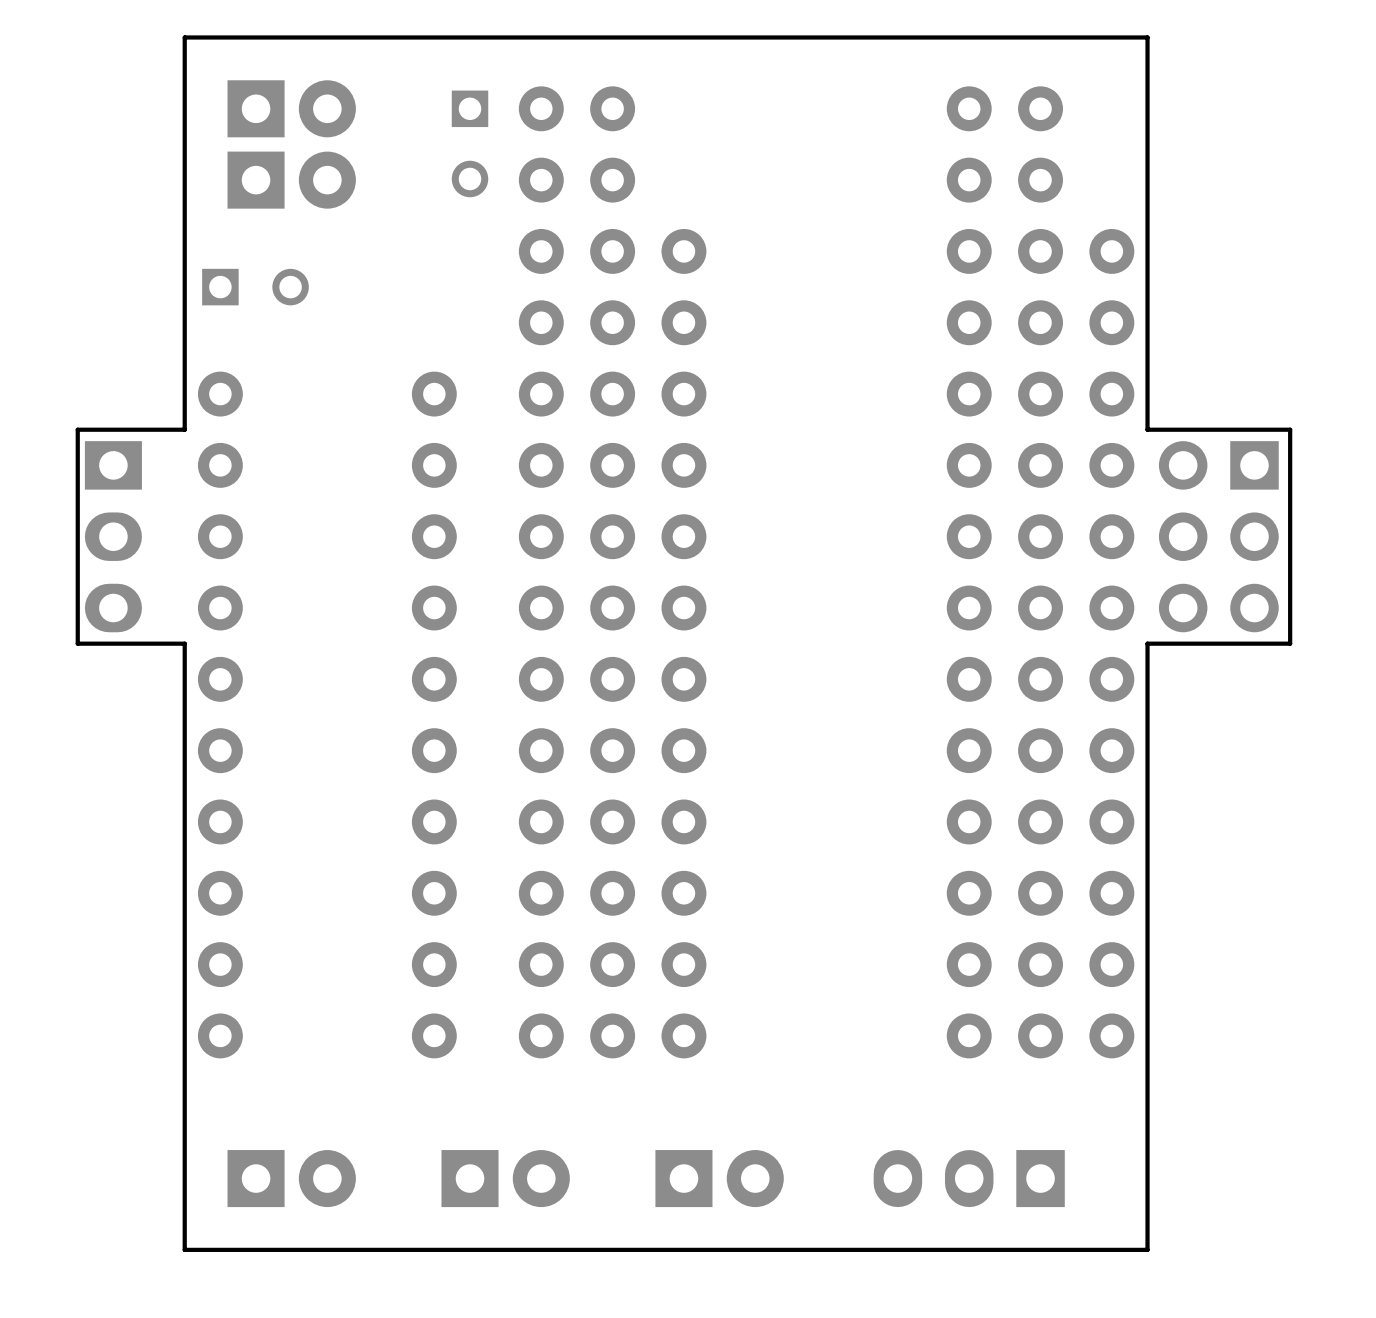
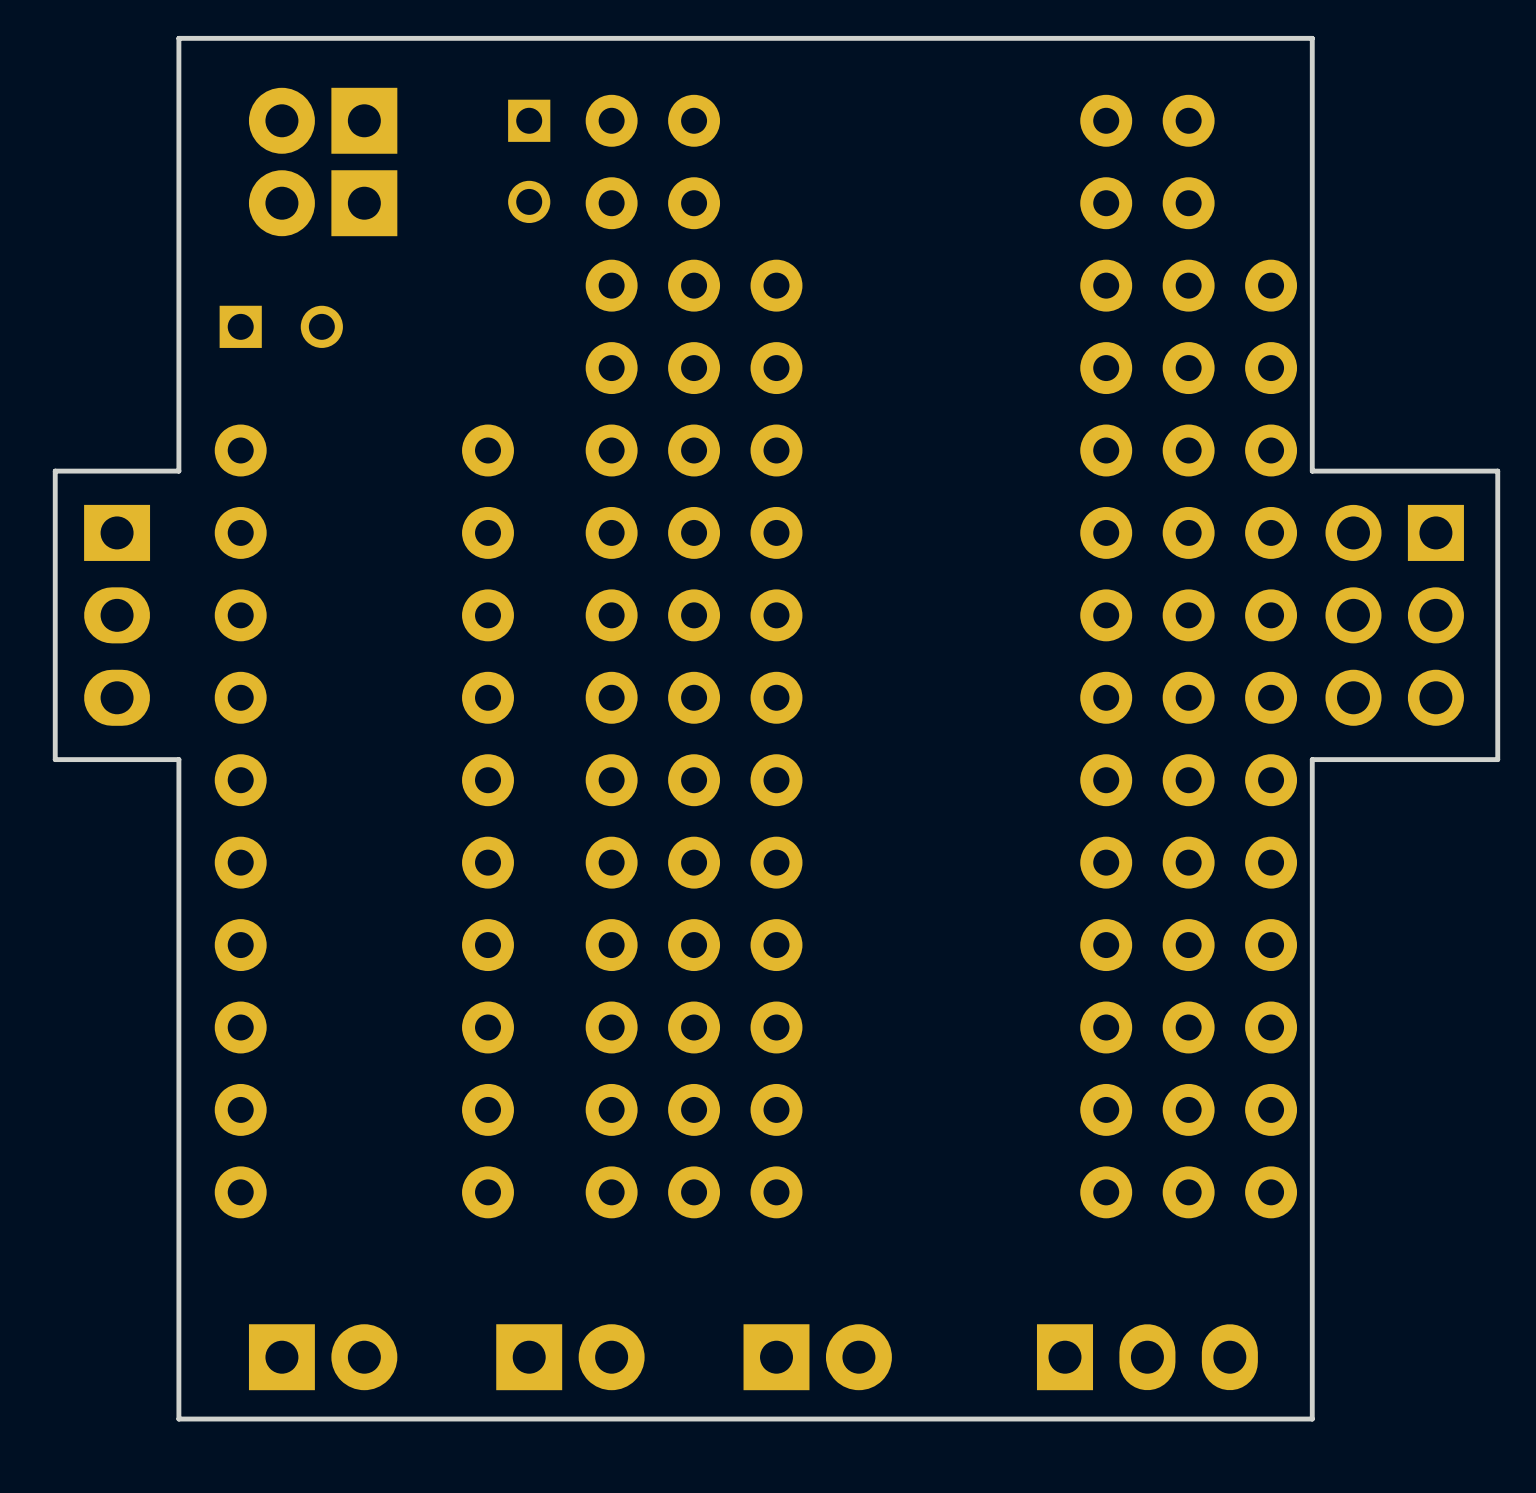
board edge: (184, 37) (184, 429) (77, 429) (77, 643) (184, 643) (184, 1249) (1147, 1249) (1147, 1232) -> (199, 38) (178, 38) (178, 471) (55, 471) (55, 759) (178, 759) (178, 1419) (1312, 1419)
part rotation: 0° (291, 108) -> 180° (323, 120)
part rotation: 0° (291, 180) -> 180° (323, 203)
board edge: (1147, 411) (1147, 429) (1290, 429) (1290, 643) (1147, 643) (1147, 661) -> (1312, 471) (1497, 471) (1497, 759) (1312, 759)
part rotation: 0° (969, 1178) -> 180° (1147, 1357)

